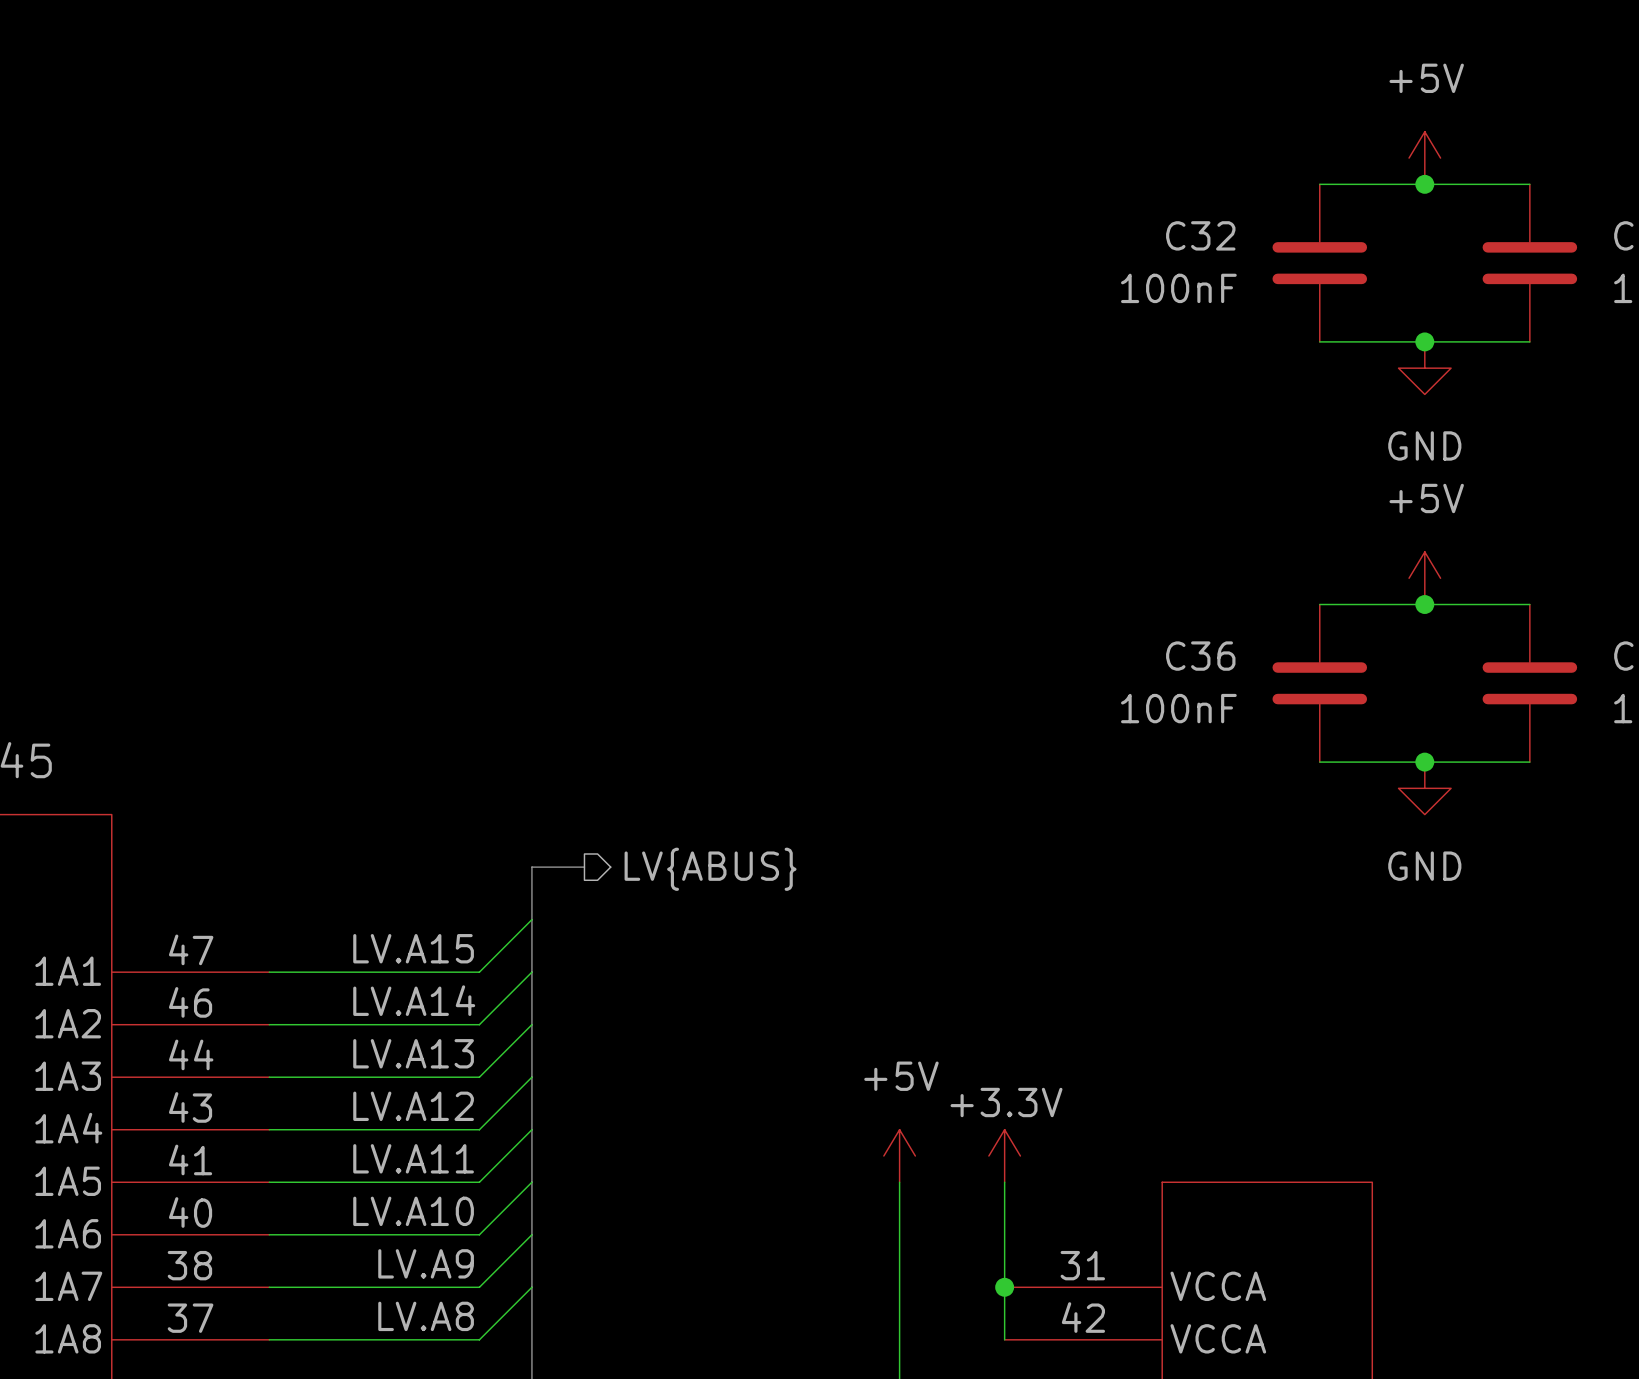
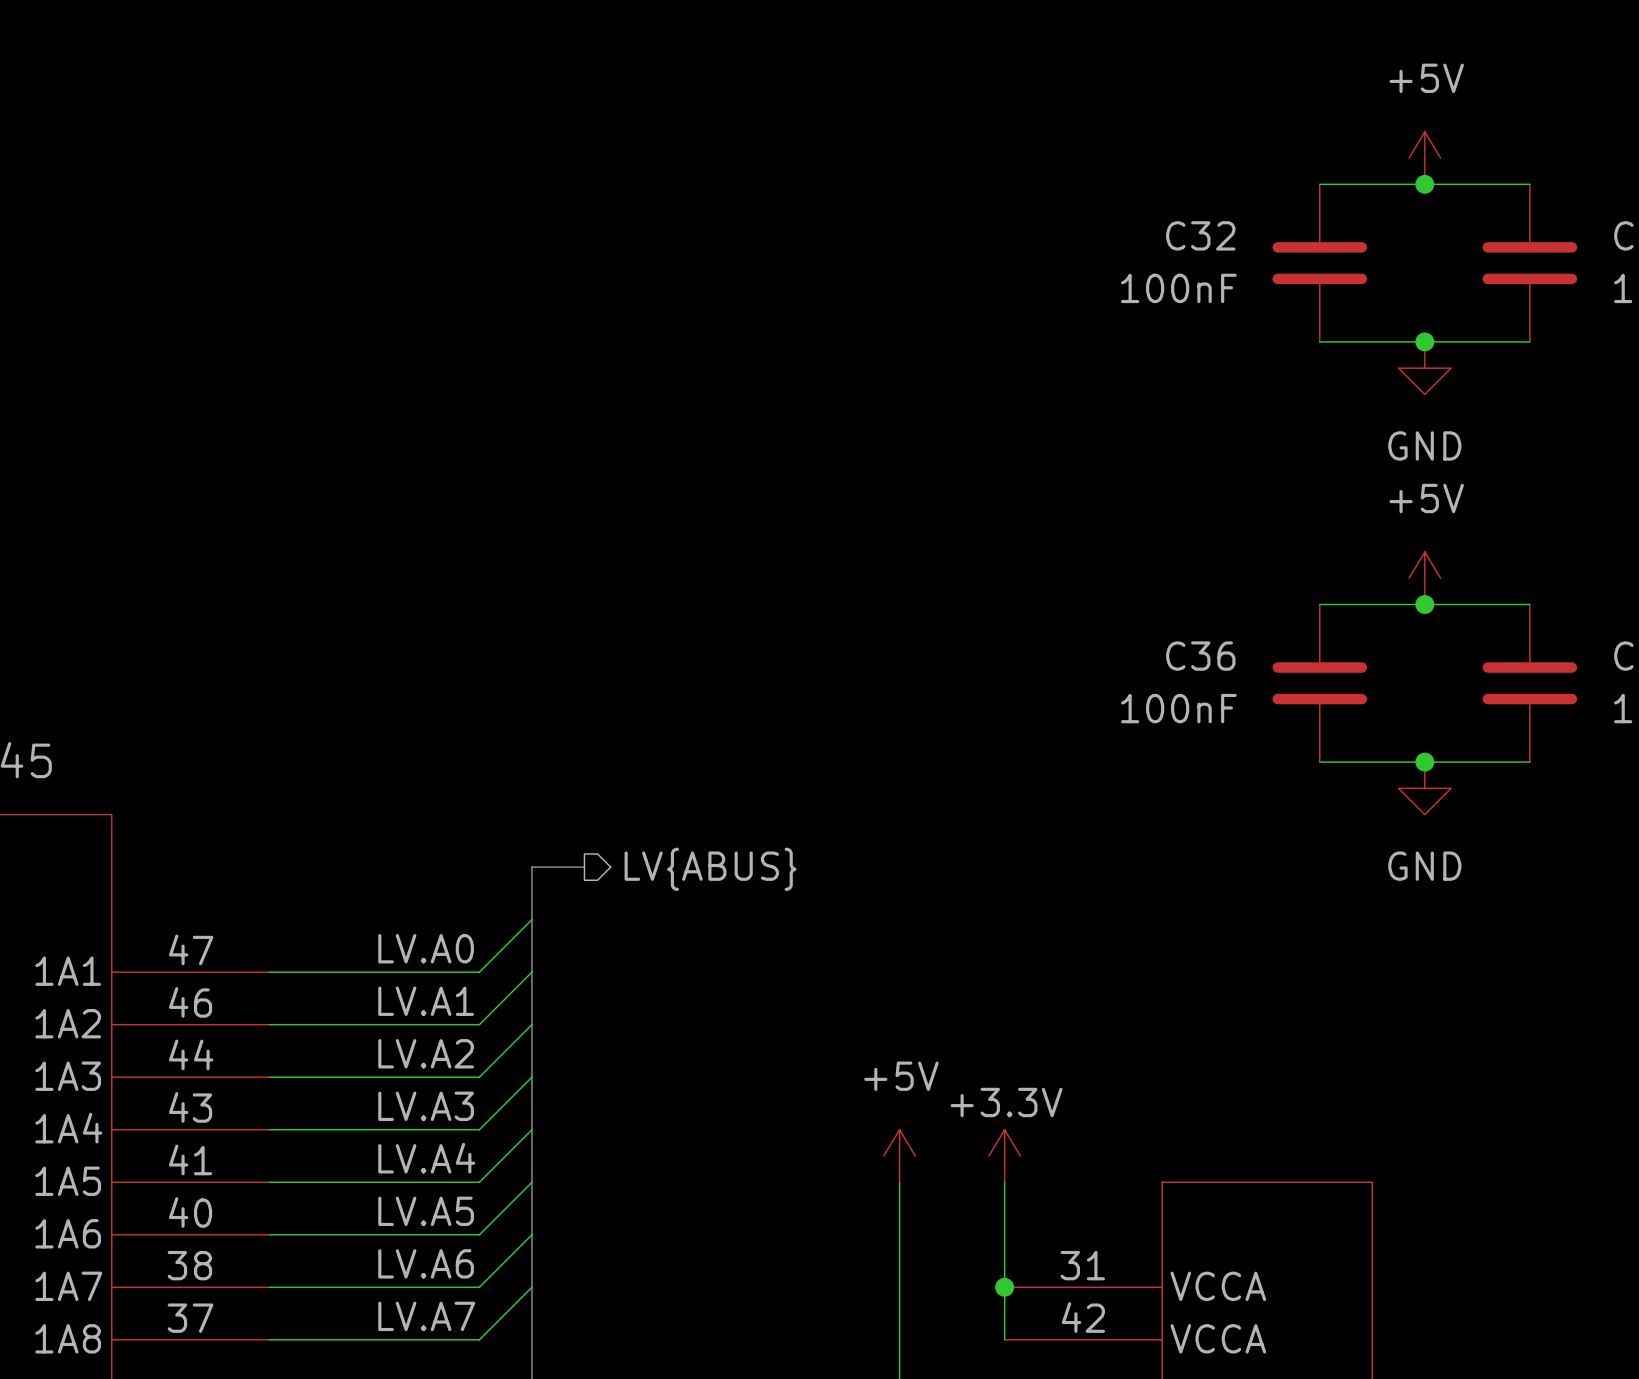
label: LV.A15 (413, 948) -> LV.A0 (426, 948)
label: LV.A14 (414, 1000) -> LV.A1 (426, 1001)
label: LV.A13 (413, 1053) -> LV.A2 (426, 1053)
label: LV.A12 (413, 1106) -> LV.A3 (426, 1106)
label: LV.A11 (413, 1158) -> LV.A4 (426, 1158)
label: LV.A10 (413, 1211) -> LV.A5 (426, 1211)
label: LV.A9 (426, 1263) -> LV.A6 (426, 1263)
label: LV.A8 (426, 1316) -> LV.A7 (426, 1316)

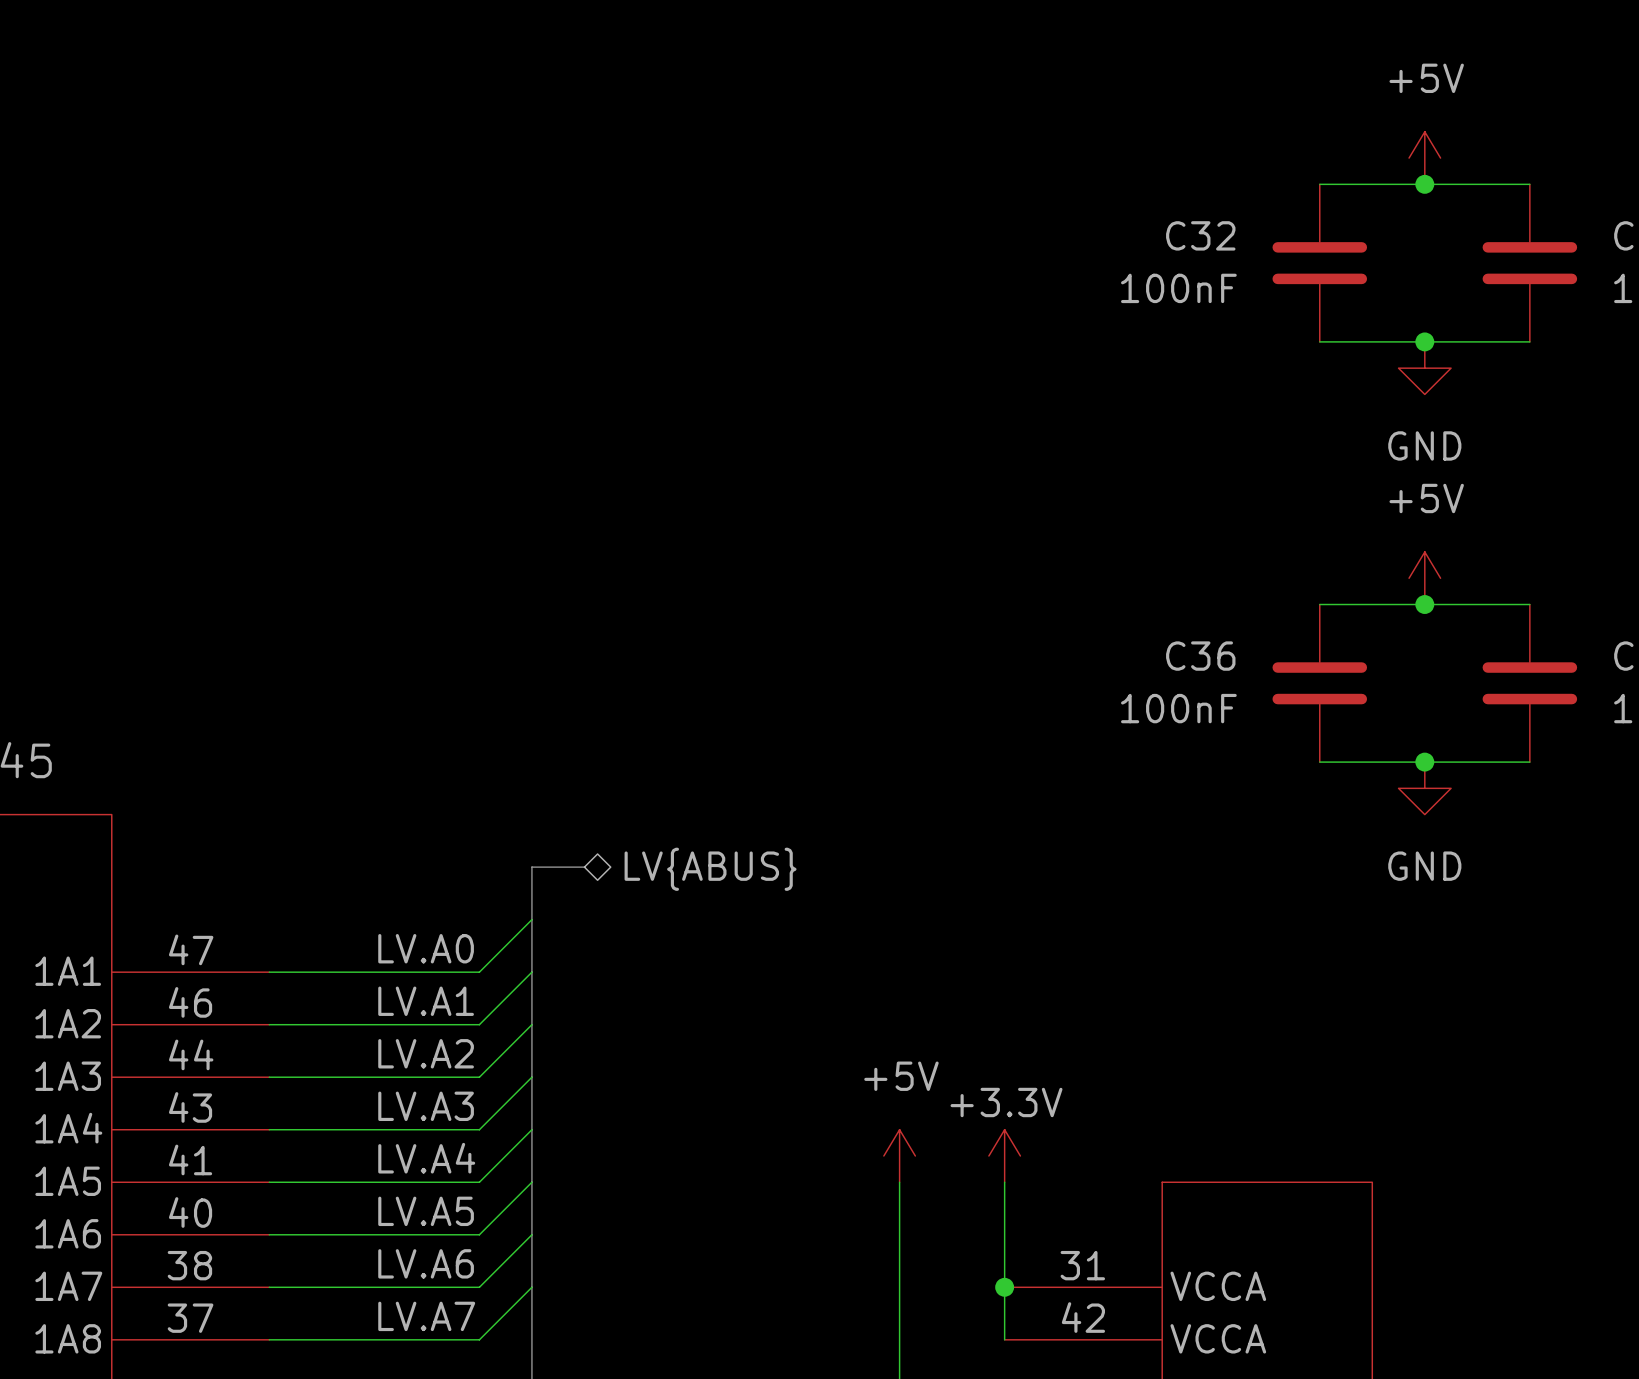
hierarchical label shape: output (710, 869) -> bidirectional (710, 869)

